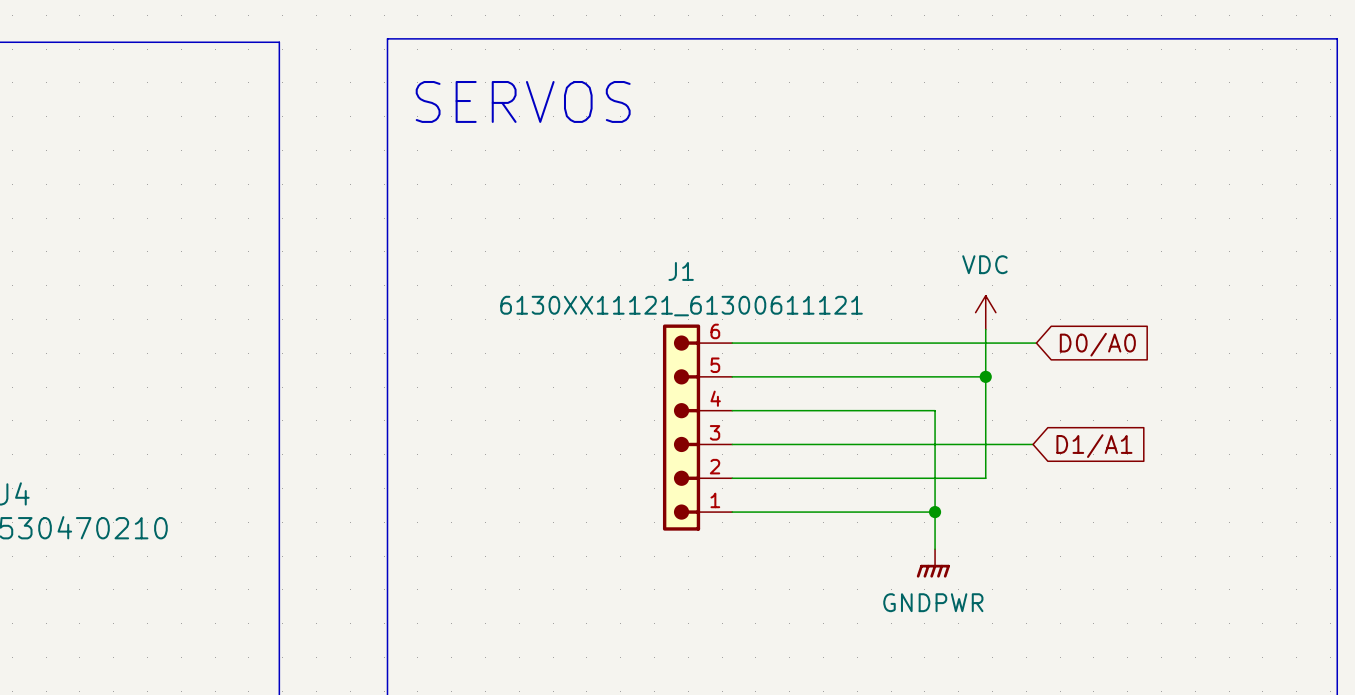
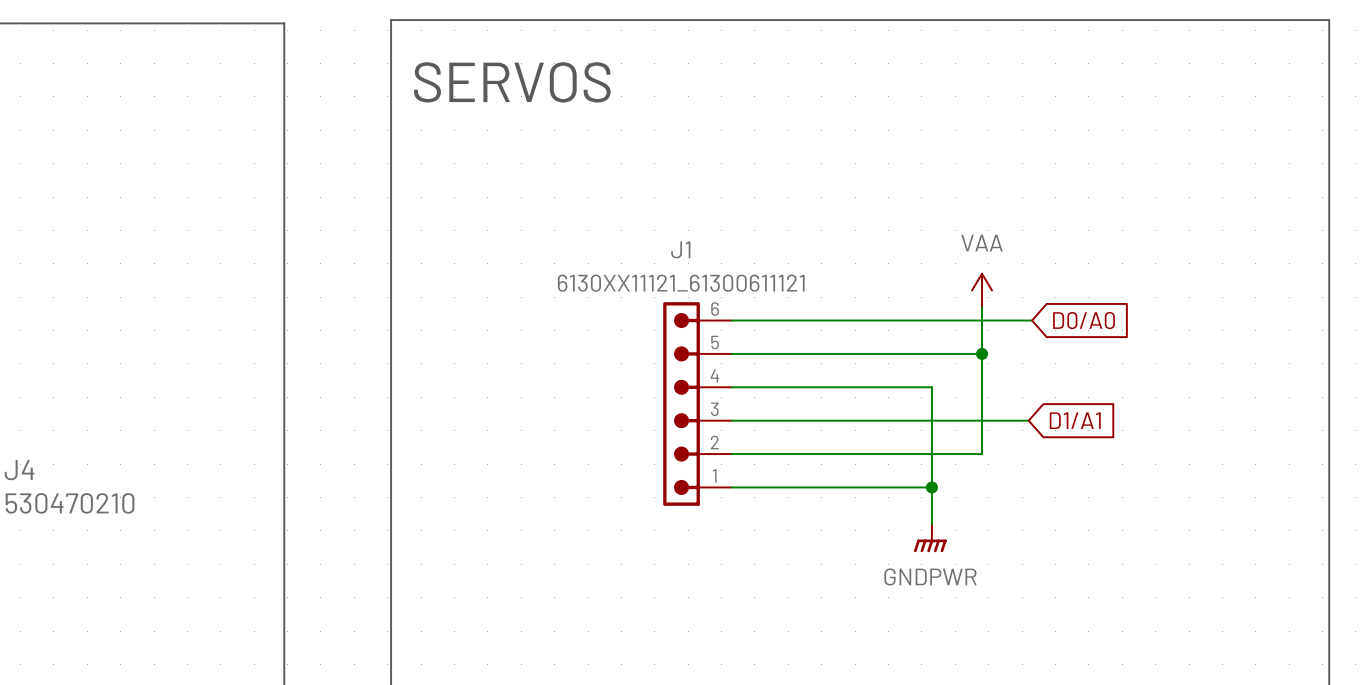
power symbol: VDC (985, 312) -> VAA (982, 290)

